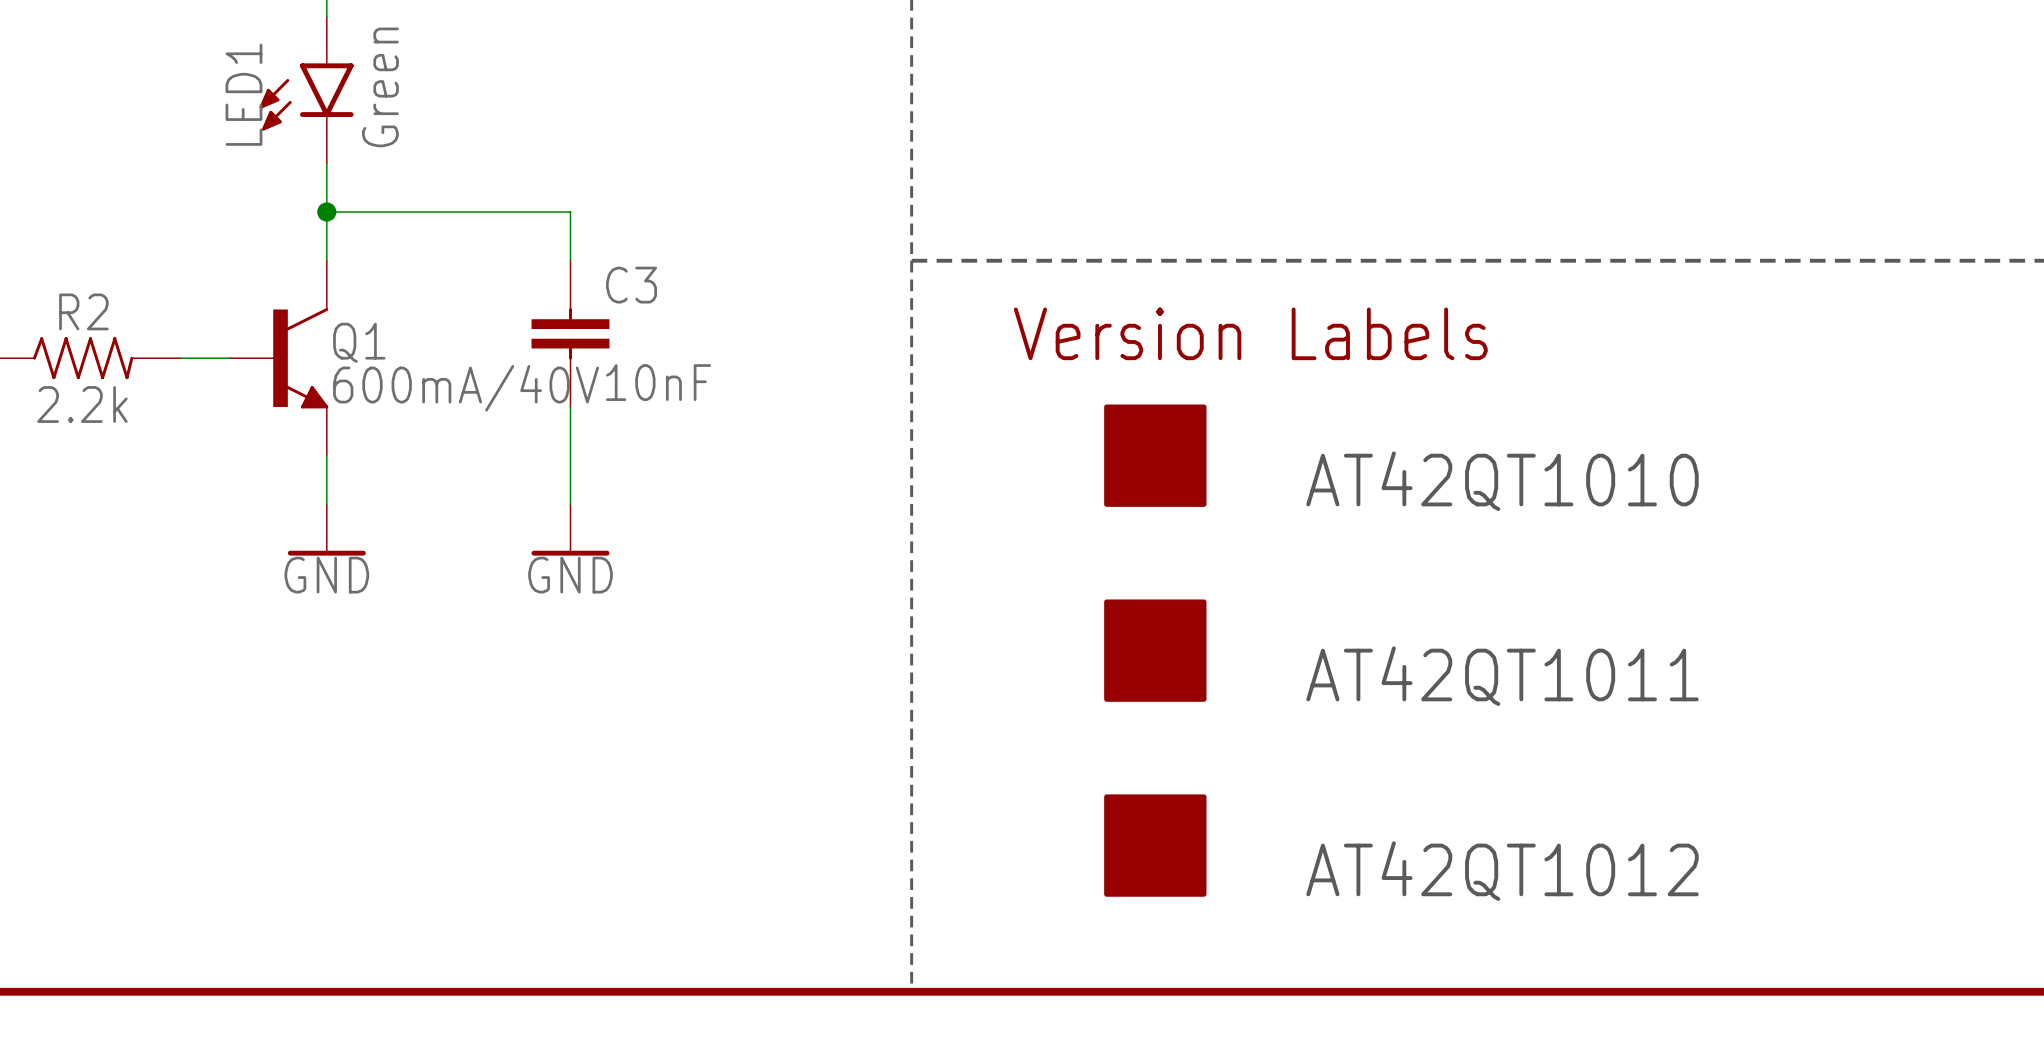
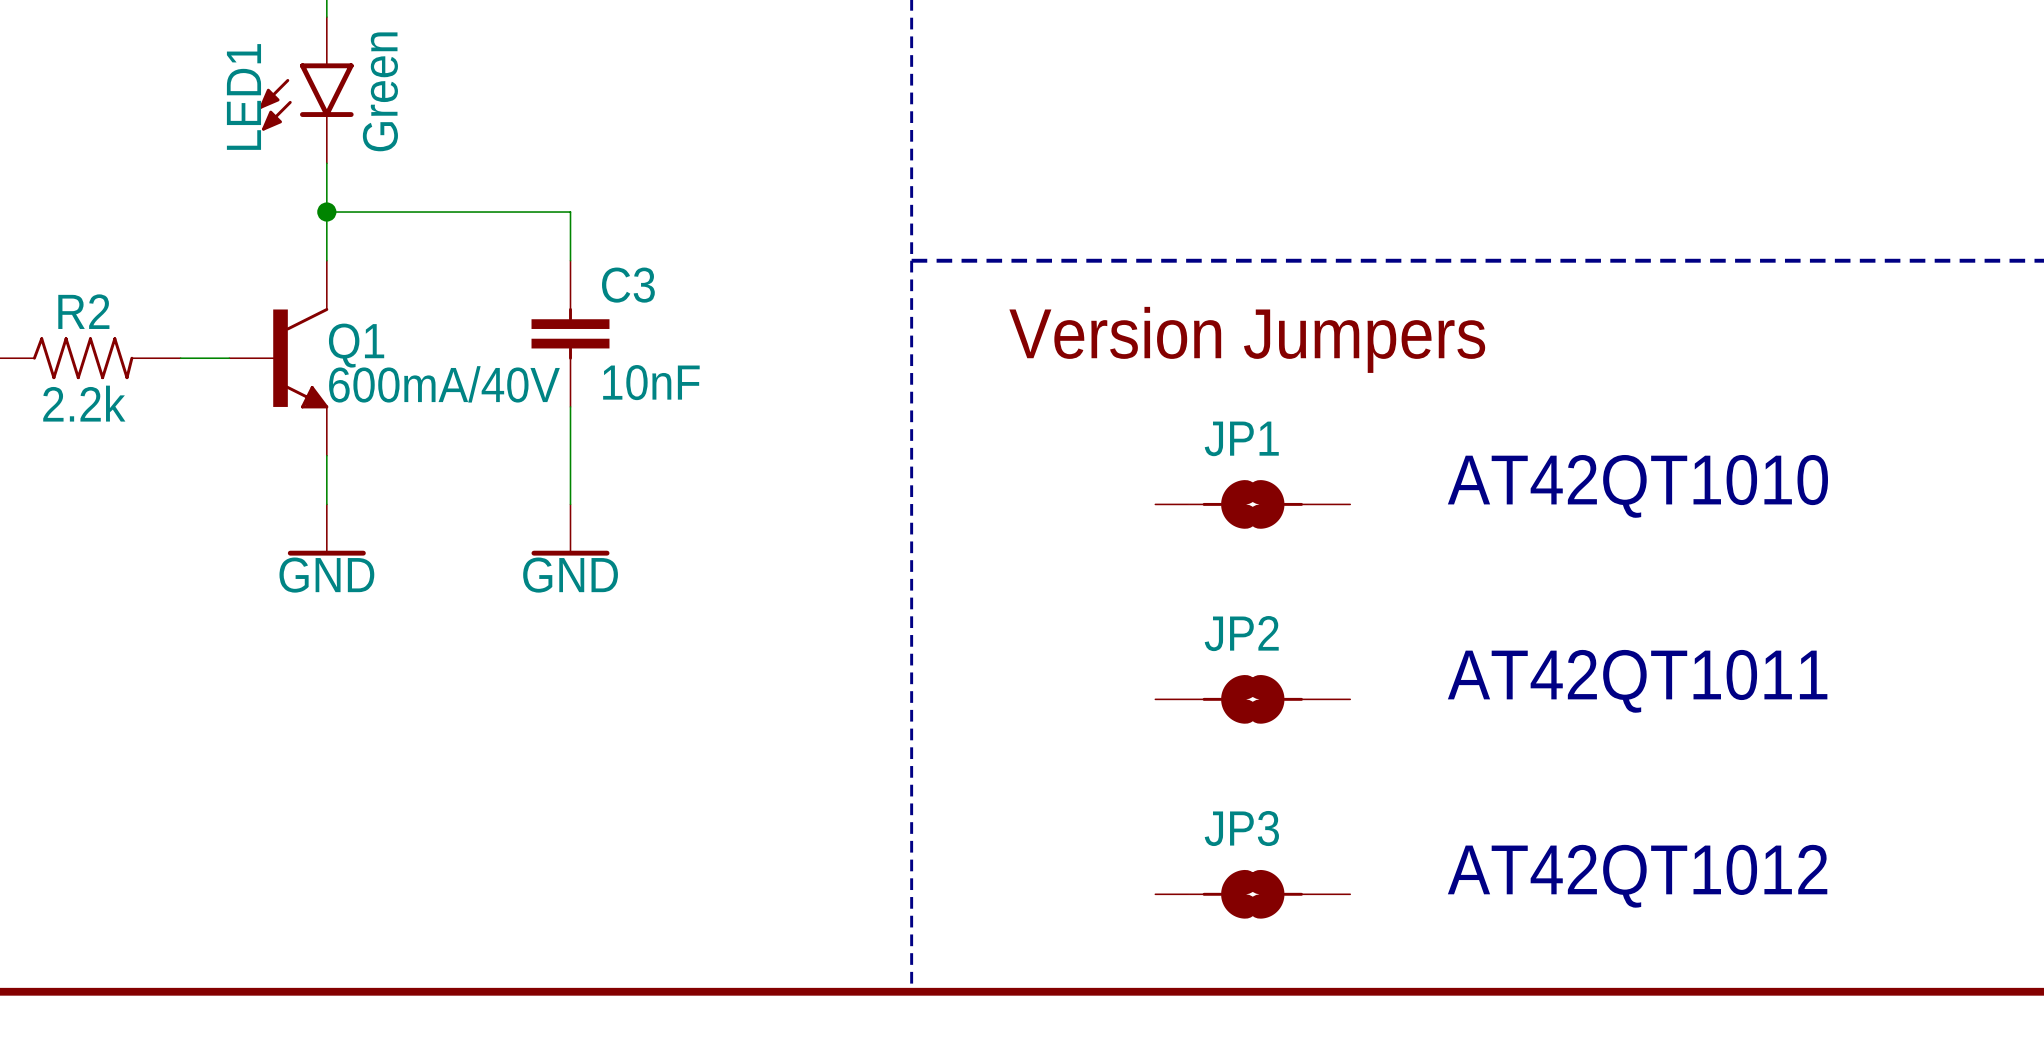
text: Version Labels (1250, 333) -> Version Jumpers (1247, 339)
part: (1155, 455) -> none
text position: AT42QT1010 (1502, 481) -> AT42QT1010 (1637, 486)
JP1: none -> (1252, 504)
part: (1155, 650) -> none
text position: AT42QT1011 (1502, 676) -> AT42QT1011 (1637, 681)
JP2: none -> (1252, 699)
part: (1155, 845) -> none
text position: AT42QT1012 (1502, 871) -> AT42QT1012 (1637, 876)
JP3: none -> (1252, 894)

